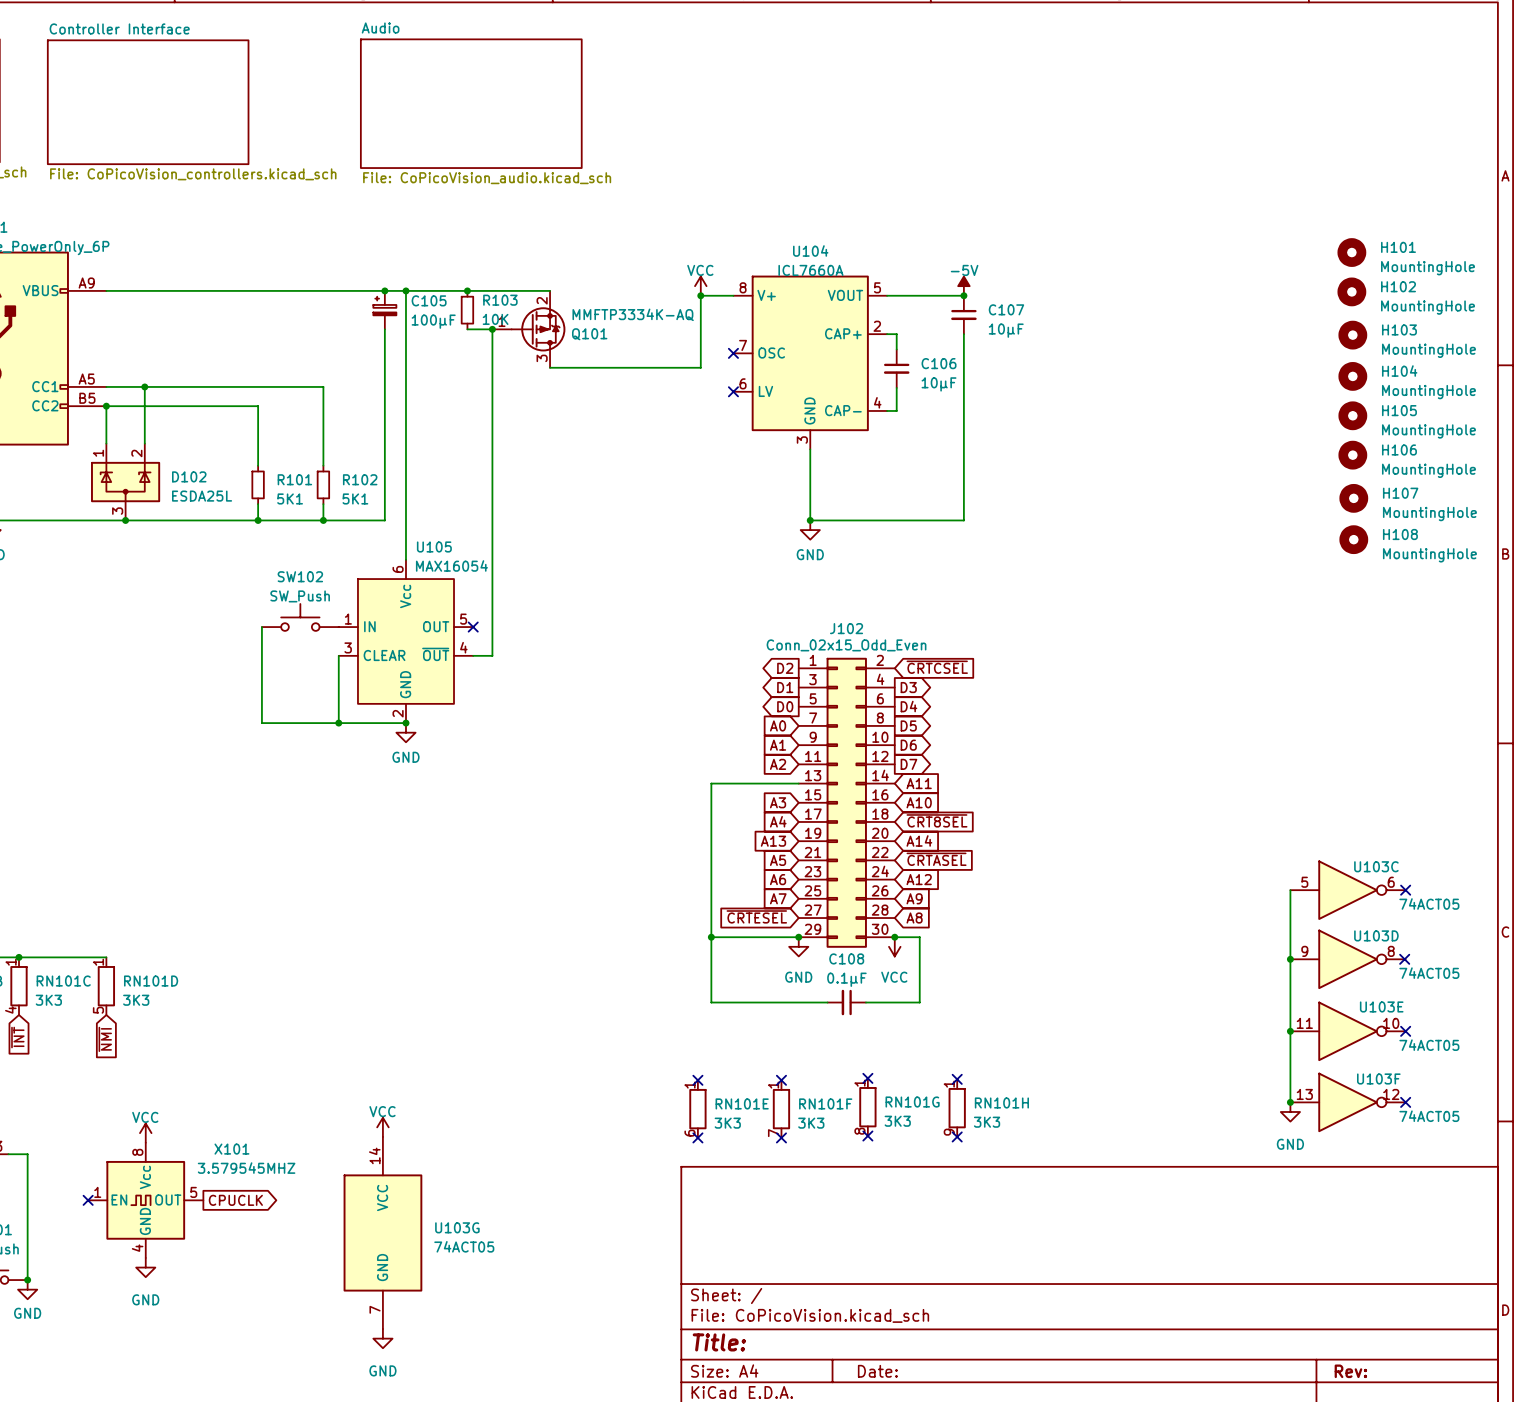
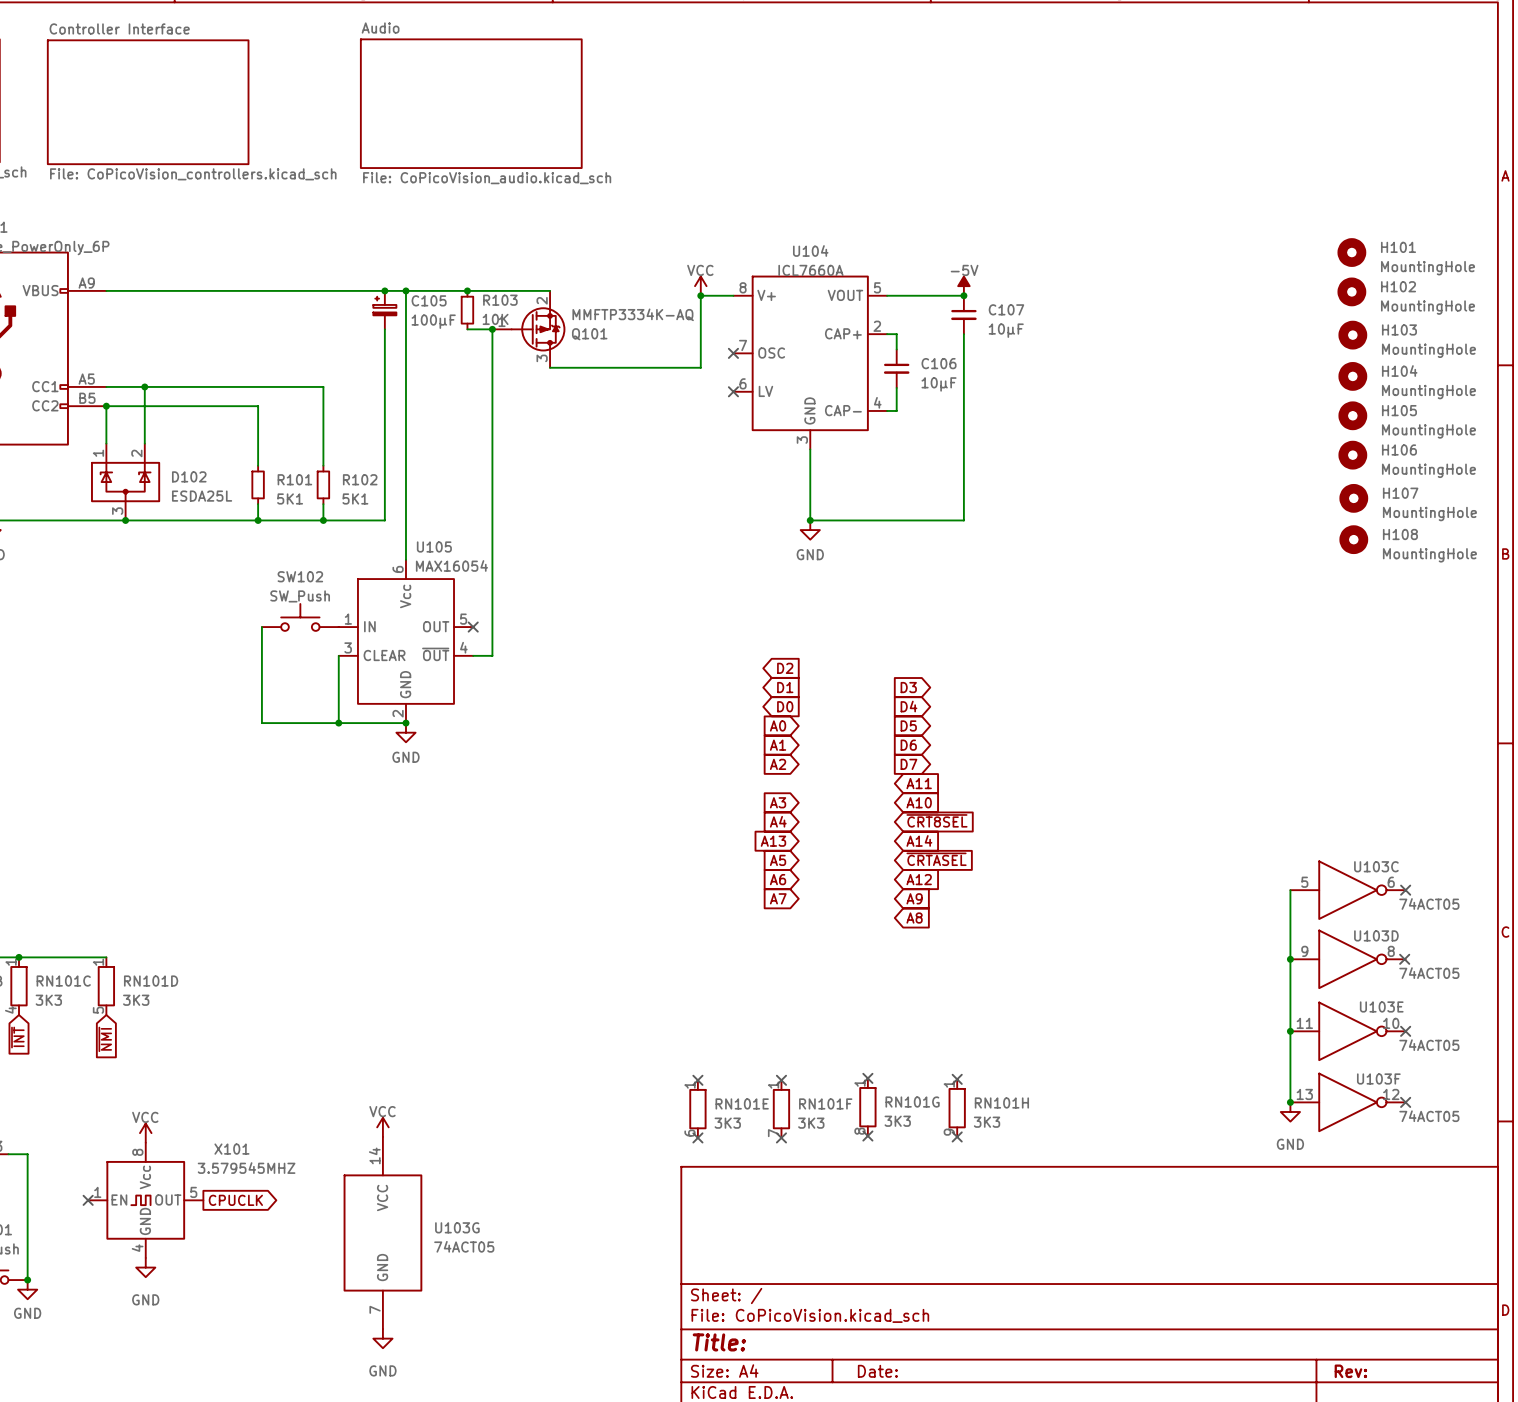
global label: ~{CRTCSEL} (937, 667) -> none
wire: (798, 783) (711, 783) (711, 1002) (827, 1002) -> none
J102: Conn_02x15_Odd_Even (846, 802) -> none
global label: ~{CRTESEL} (756, 916) -> none
wire: (711, 937) (798, 937) -> none
junction: (711, 937) -> none
junction: (798, 937) -> none
wire: (894, 937) (919, 937) (919, 1002) (865, 1002) -> none
junction: (894, 937) -> none
power symbol: GND (798, 946) -> none
power symbol: VCC (894, 946) -> none
C108: 0.1µF (846, 1002) -> none

